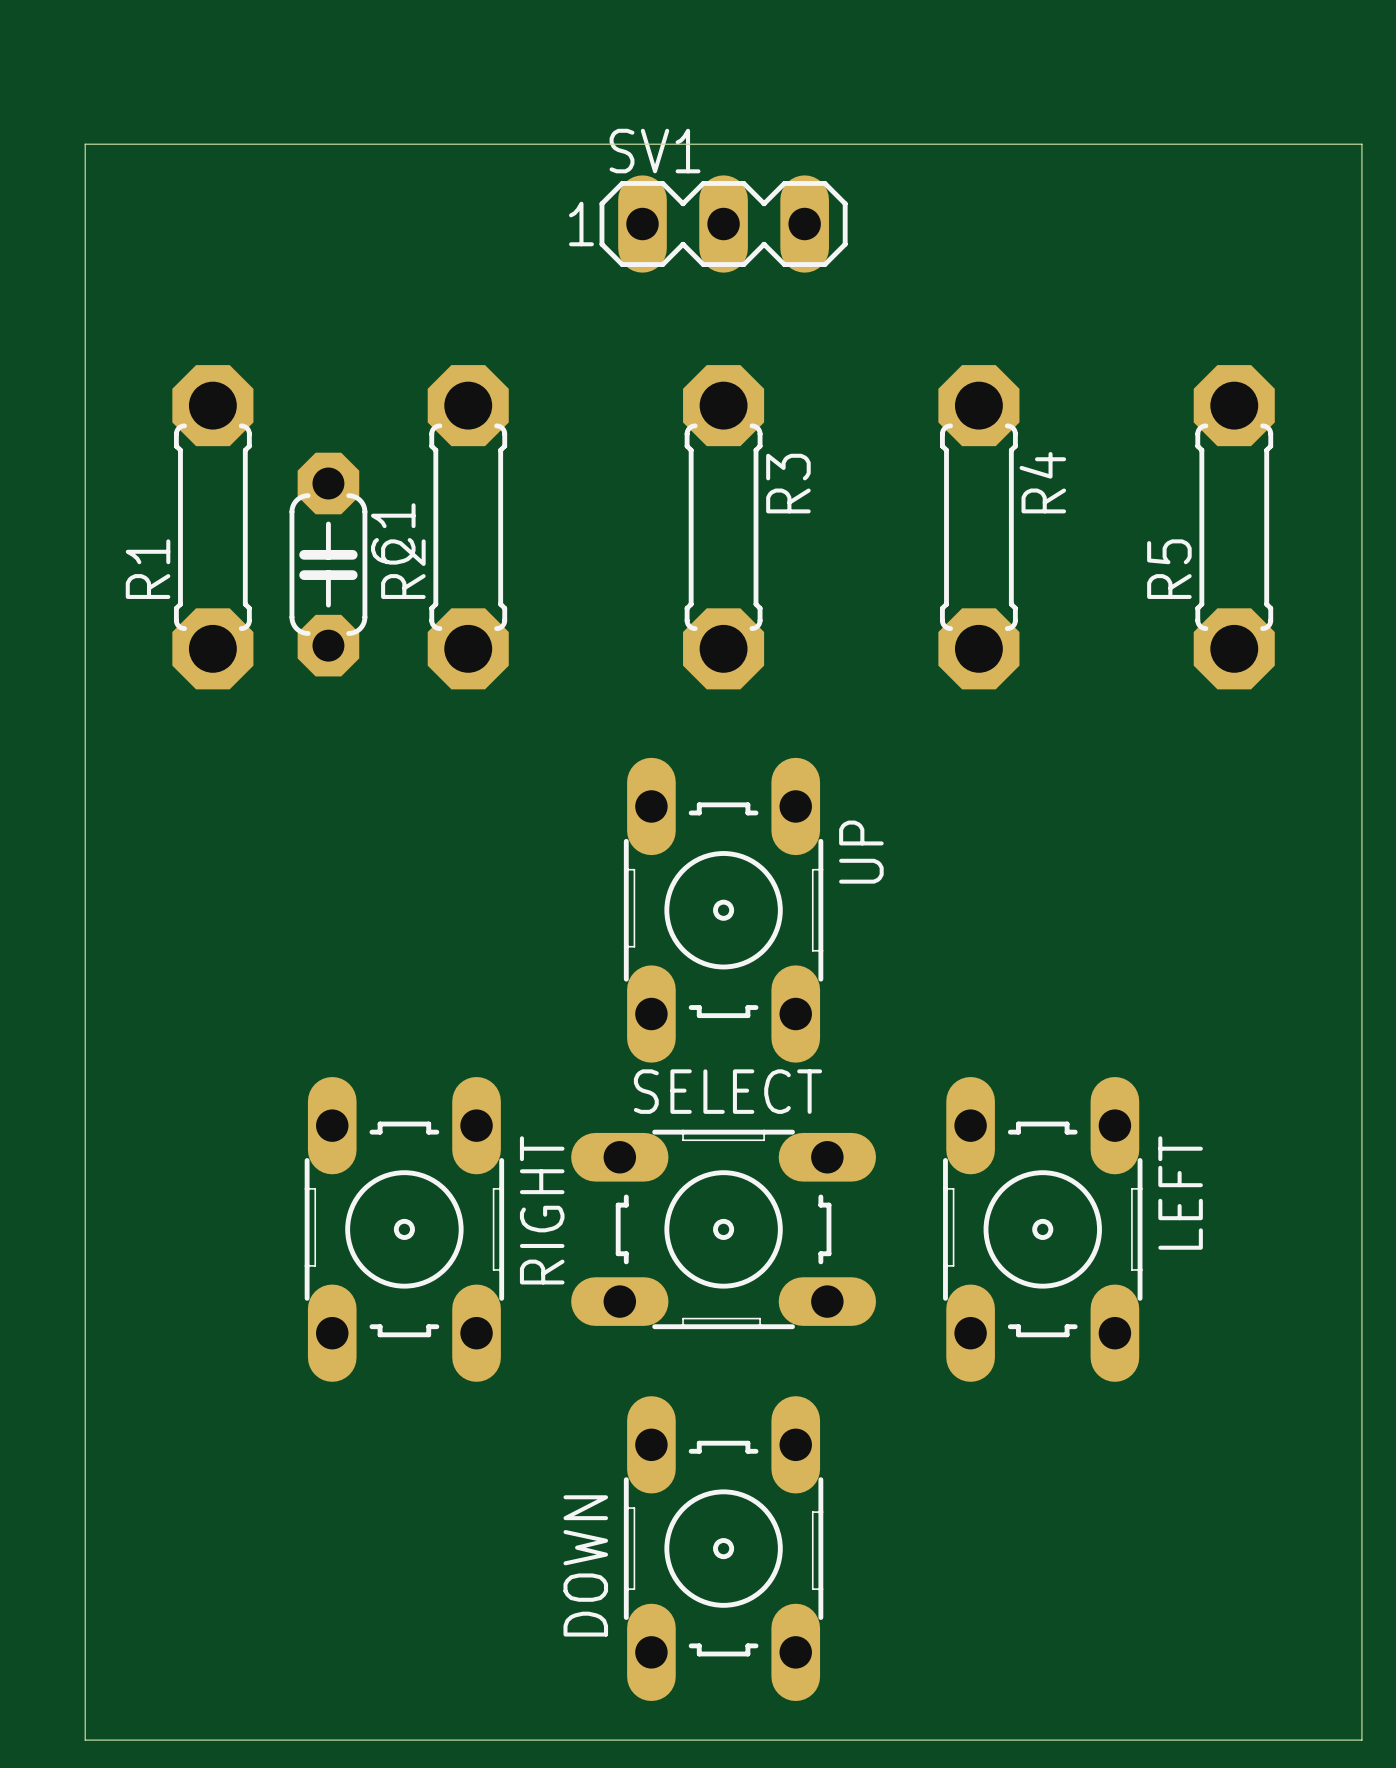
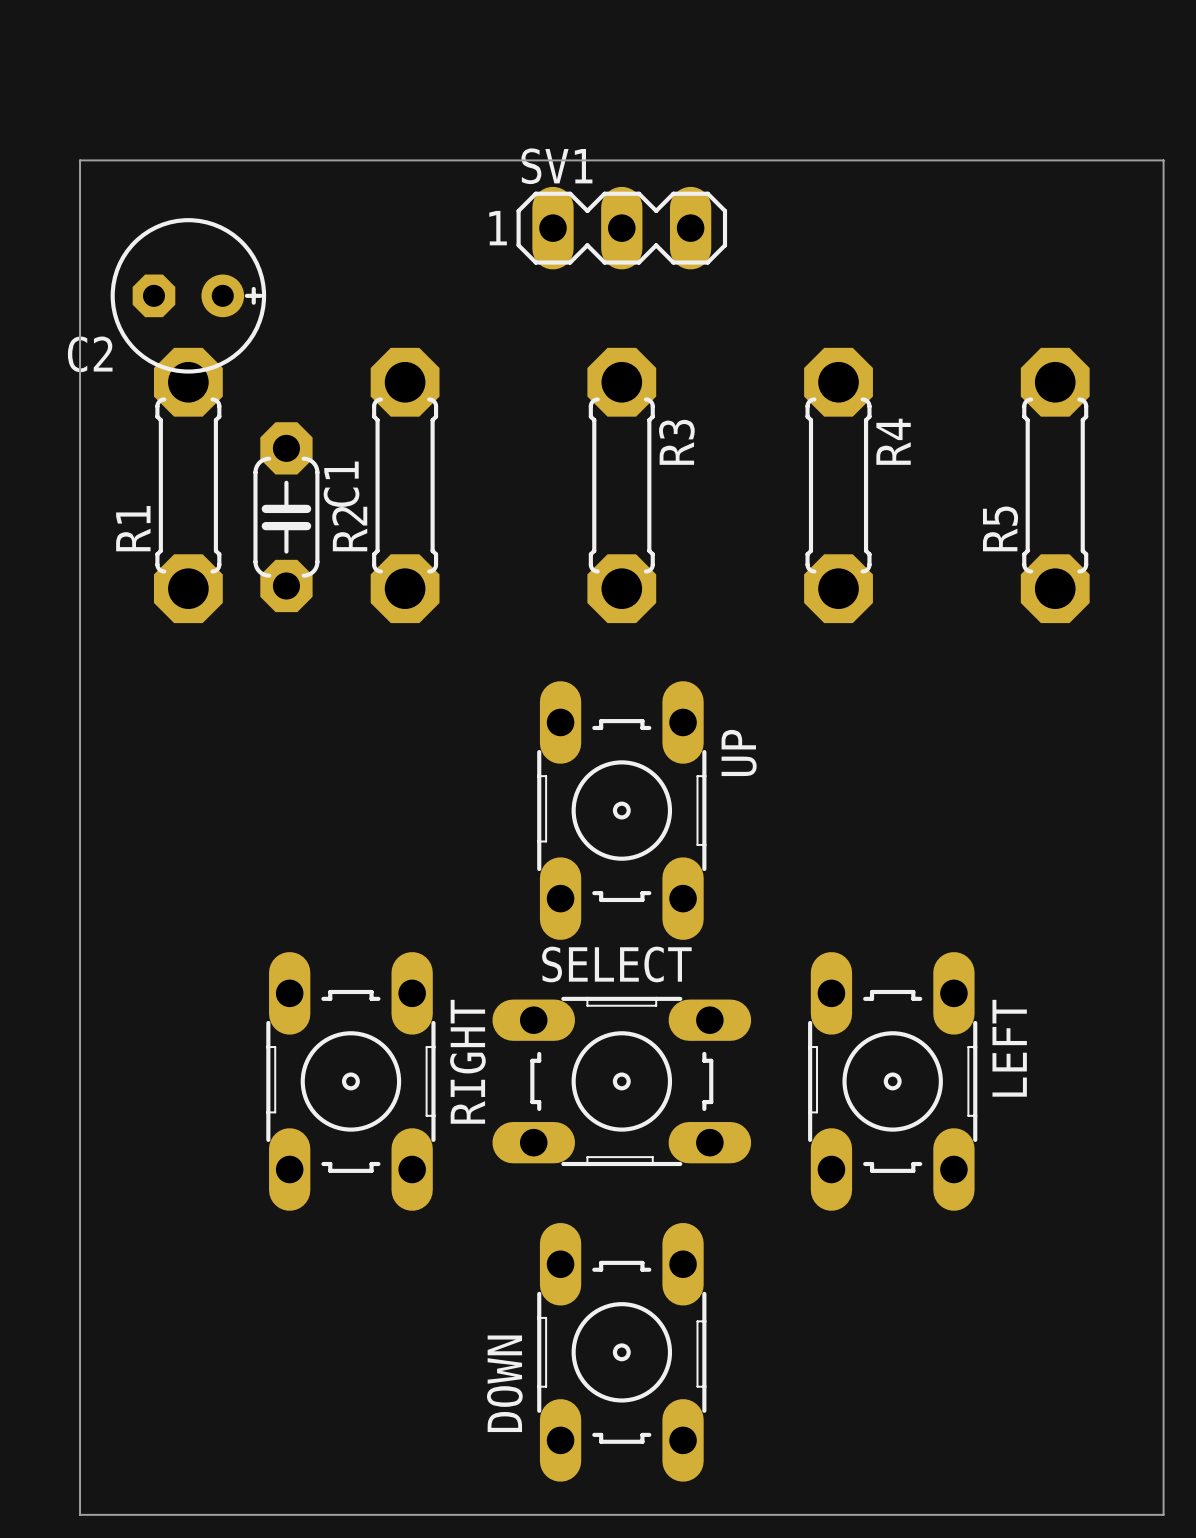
C2: none -> (188, 295)

